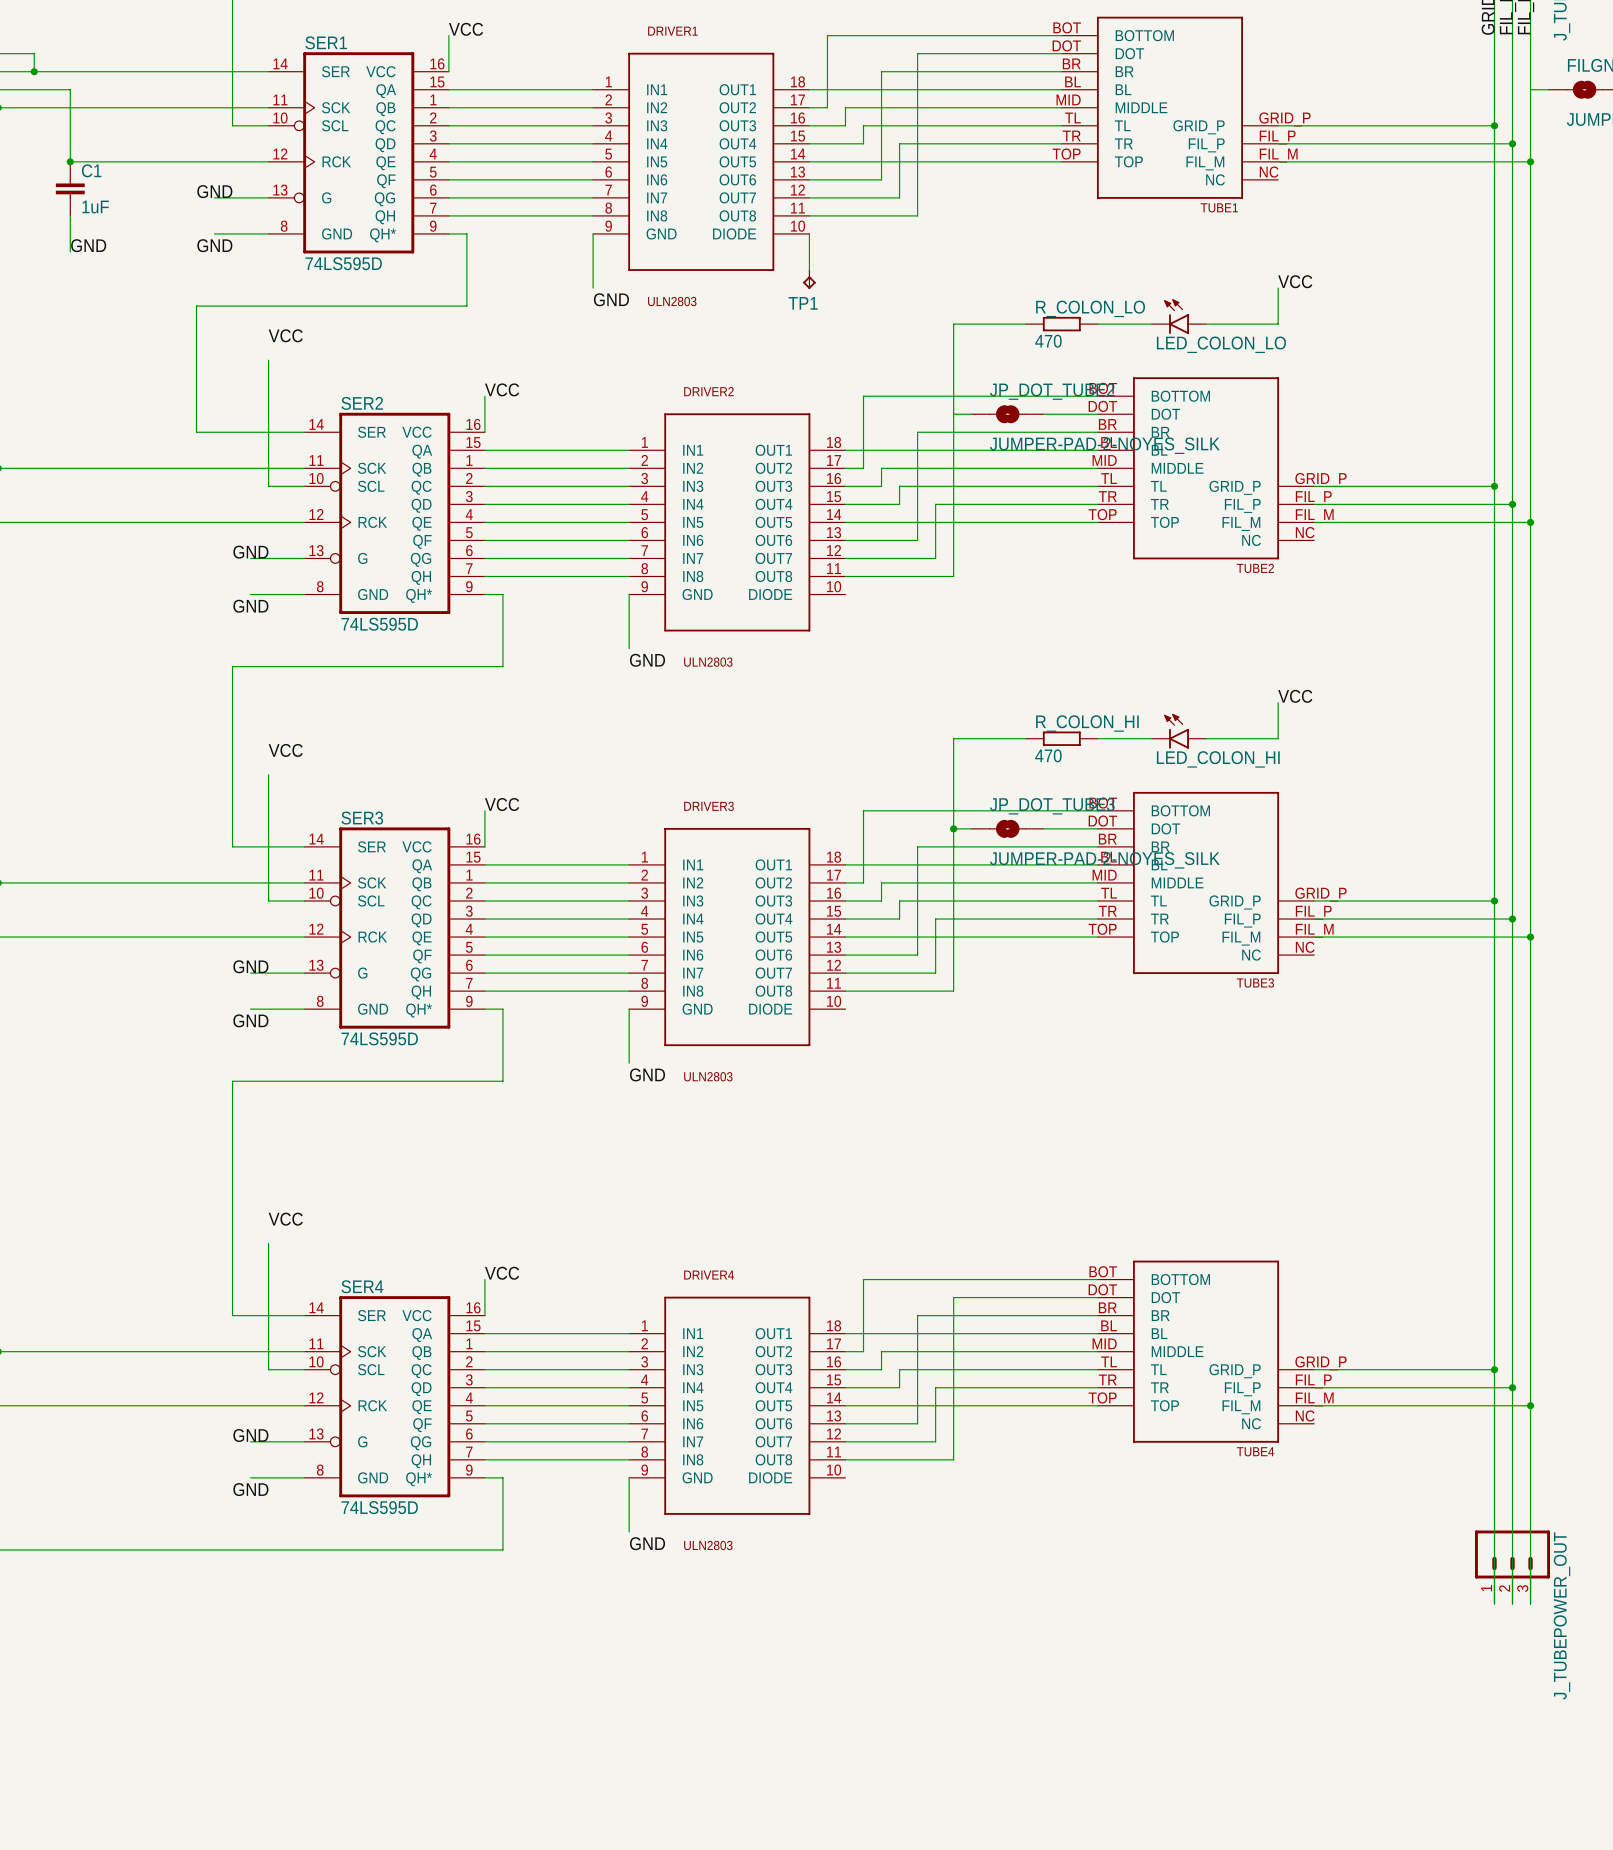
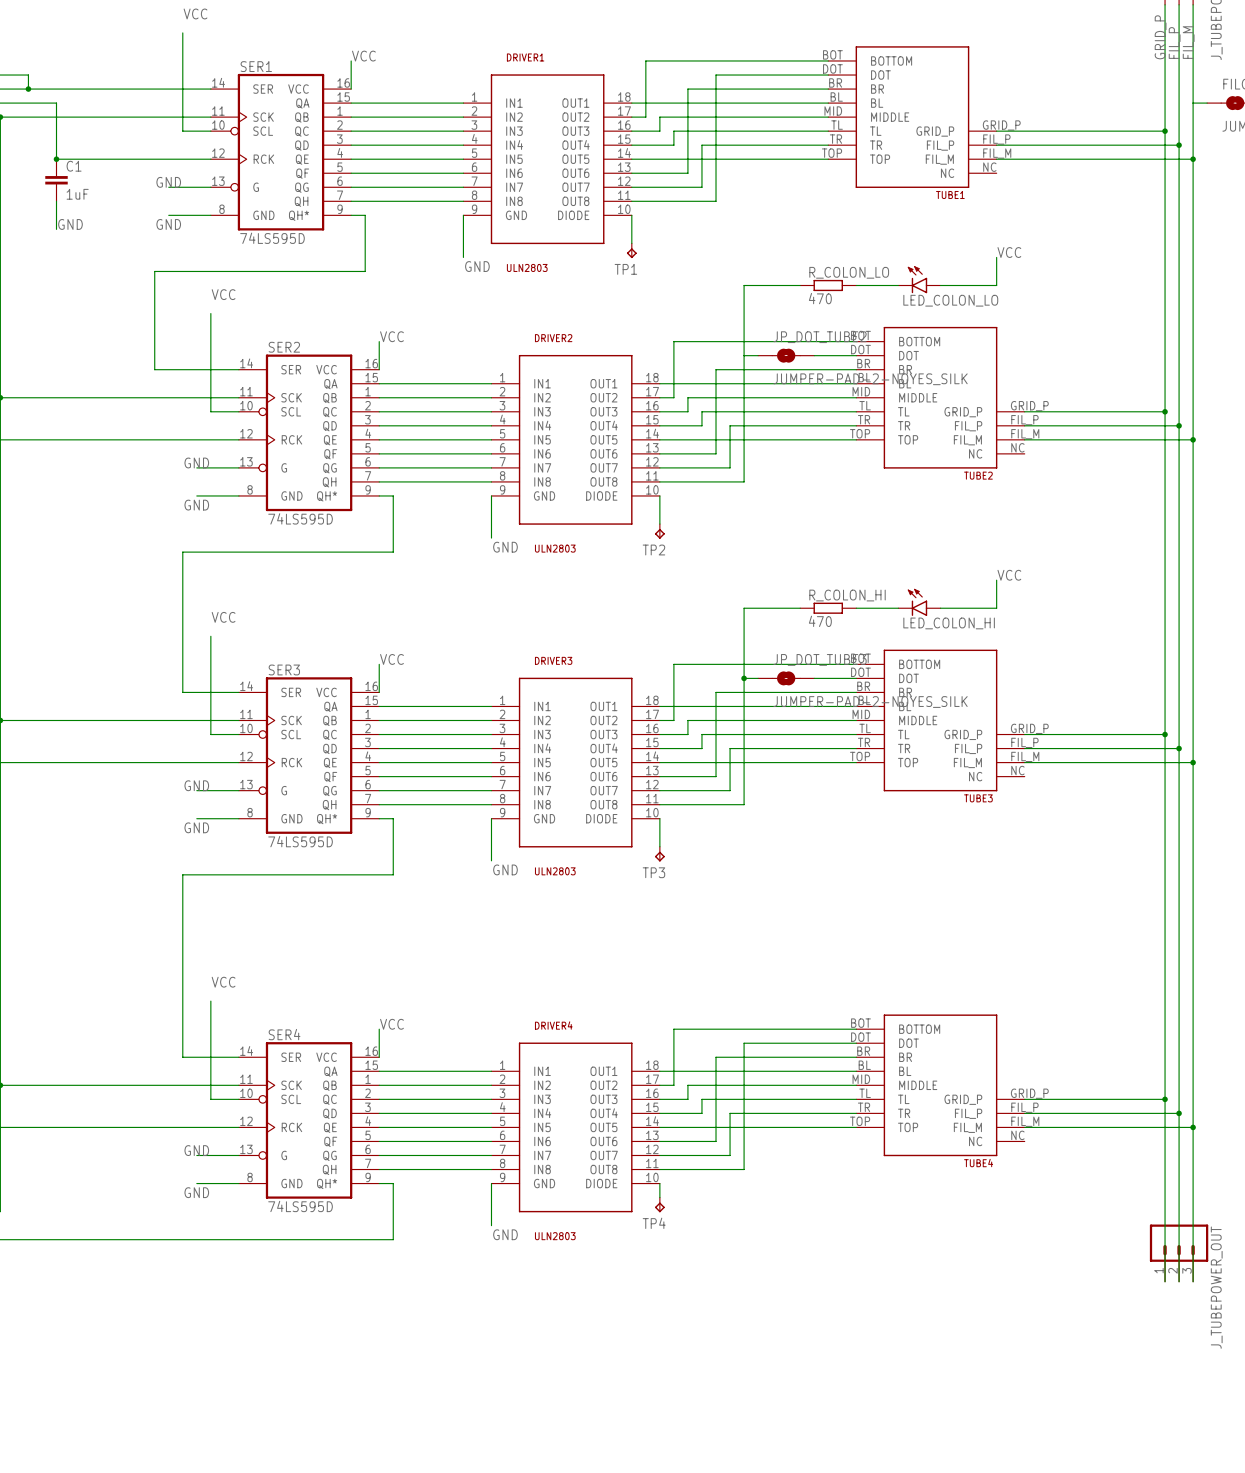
wire: none -> (659, 495) (659, 524)
TP2: none -> (659, 531)
wire: none -> (659, 818) (659, 846)
TP3: none -> (659, 854)
wire: none -> (659, 1183) (659, 1197)
TP4: none -> (659, 1204)

